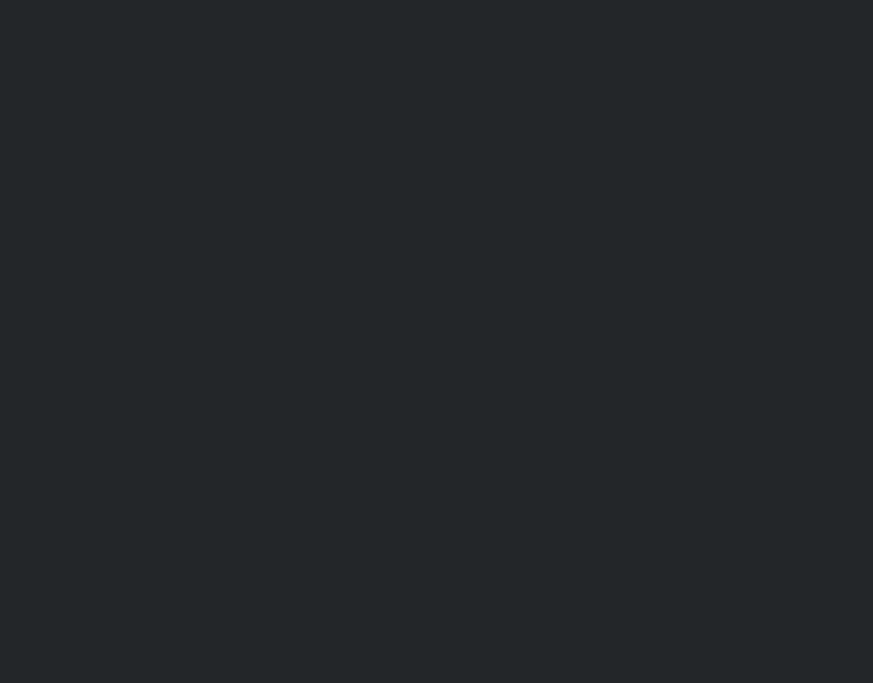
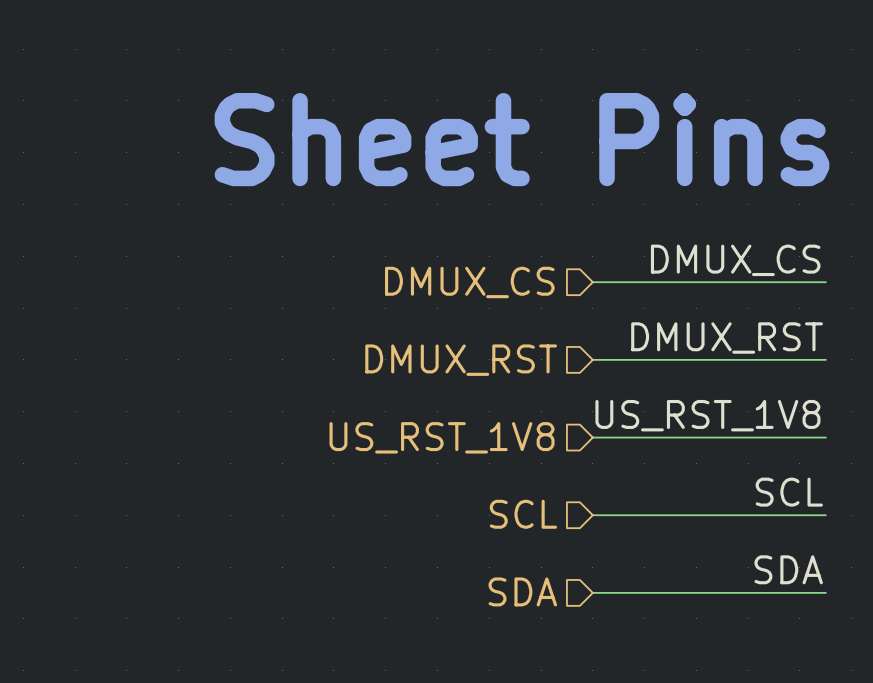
text: none -> Sheet Pins (521, 139)
label: none -> DMUX_CS (735, 260)
hierarchical label: none -> DMUX_CS (469, 282)
wire: none -> (592, 282) (825, 282)
label: none -> DMUX_RST (727, 338)
hierarchical label: none -> DMUX_RST (461, 360)
wire: none -> (592, 359) (825, 359)
label: none -> US_RST_1V8 (707, 415)
hierarchical label: none -> US_RST_1V8 (442, 437)
wire: none -> (592, 437) (825, 437)
label: none -> SCL (789, 492)
hierarchical label: none -> SCL (523, 514)
wire: none -> (592, 515) (825, 515)
label: none -> SDA (788, 569)
hierarchical label: none -> SDA (522, 591)
wire: none -> (592, 592) (825, 592)

